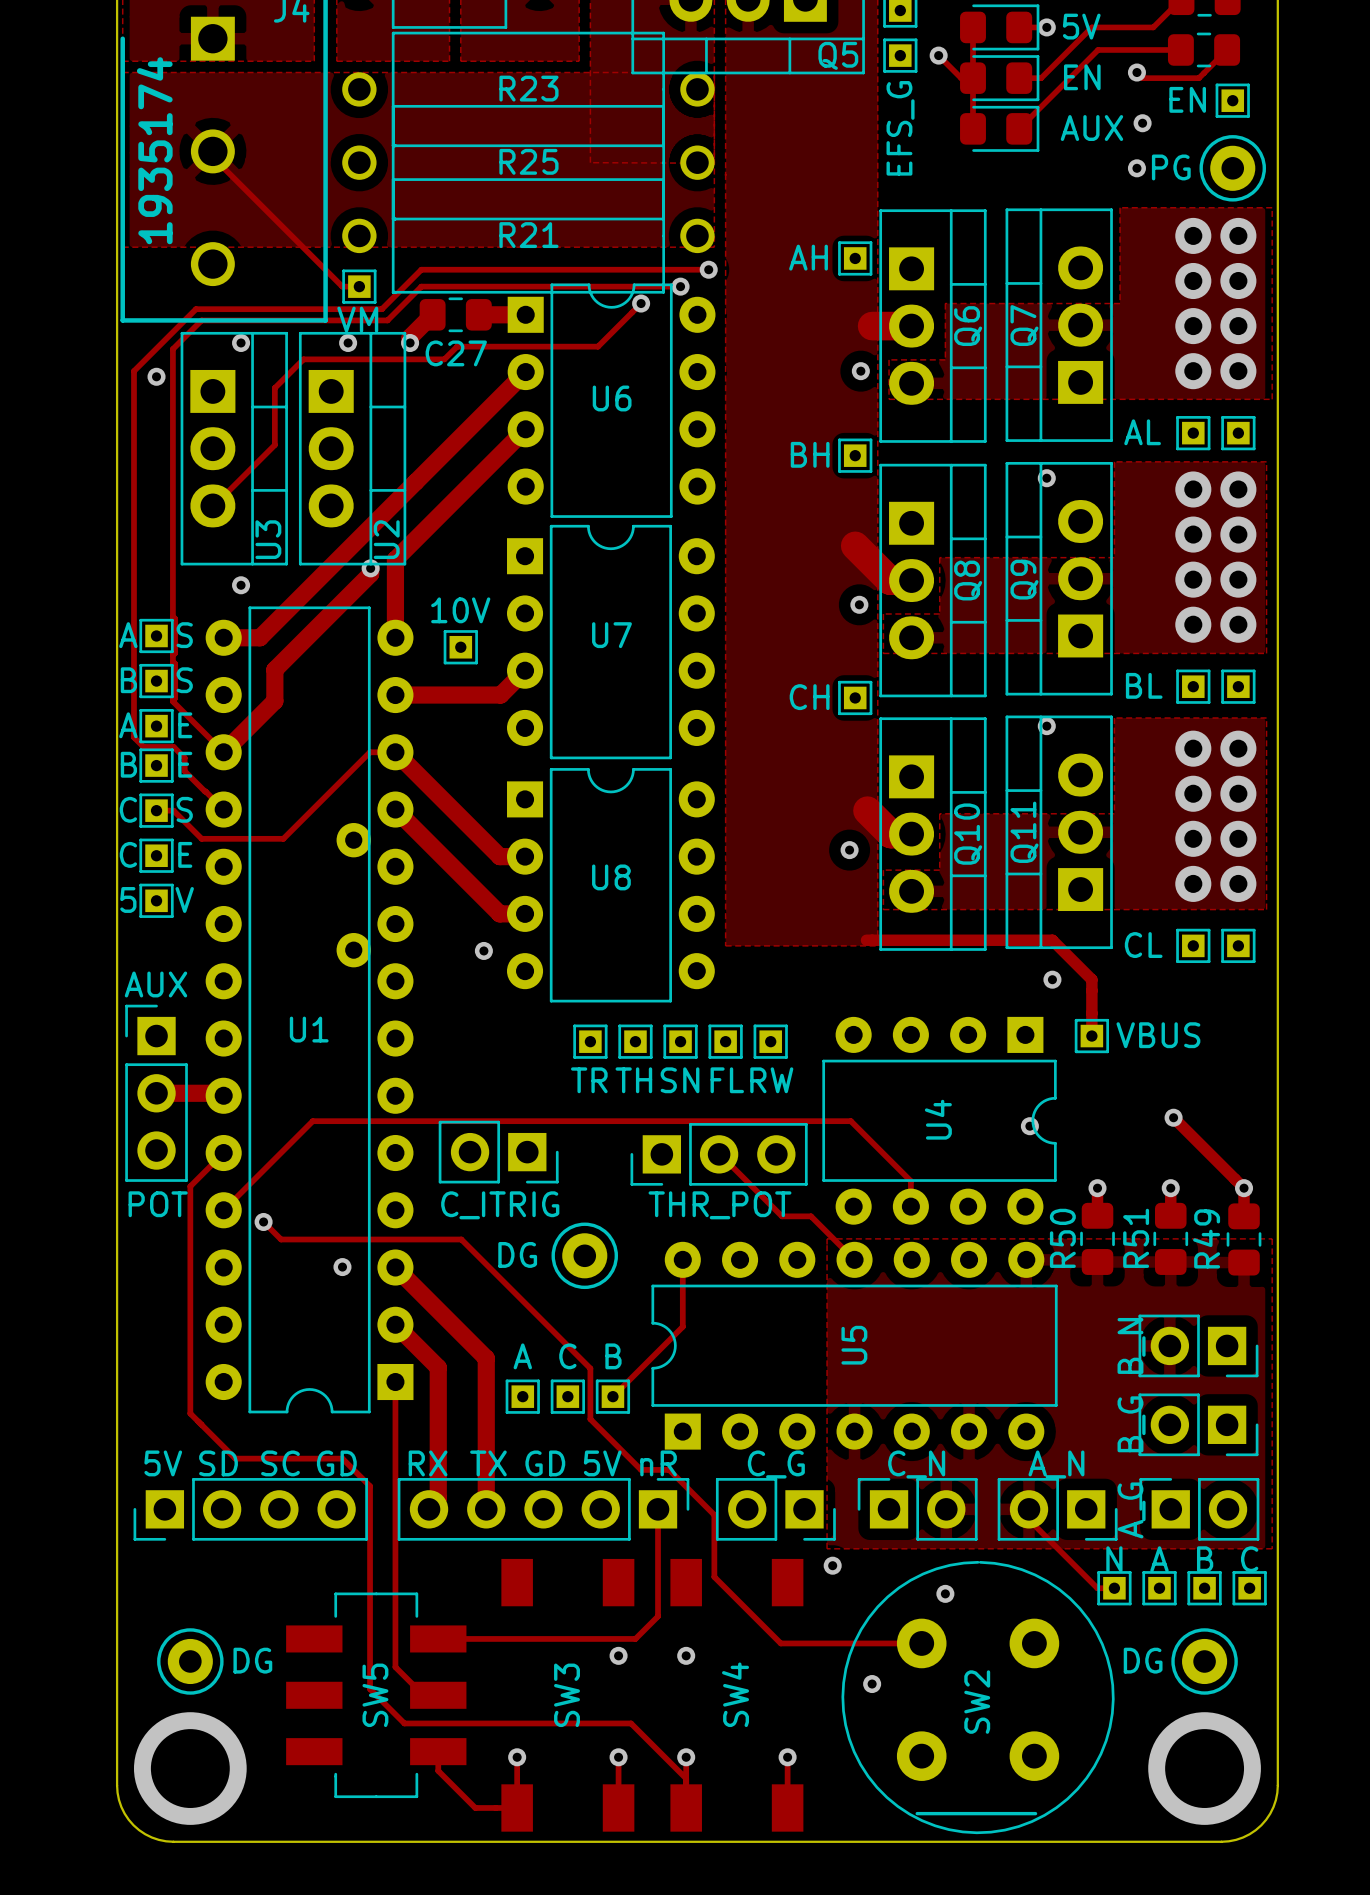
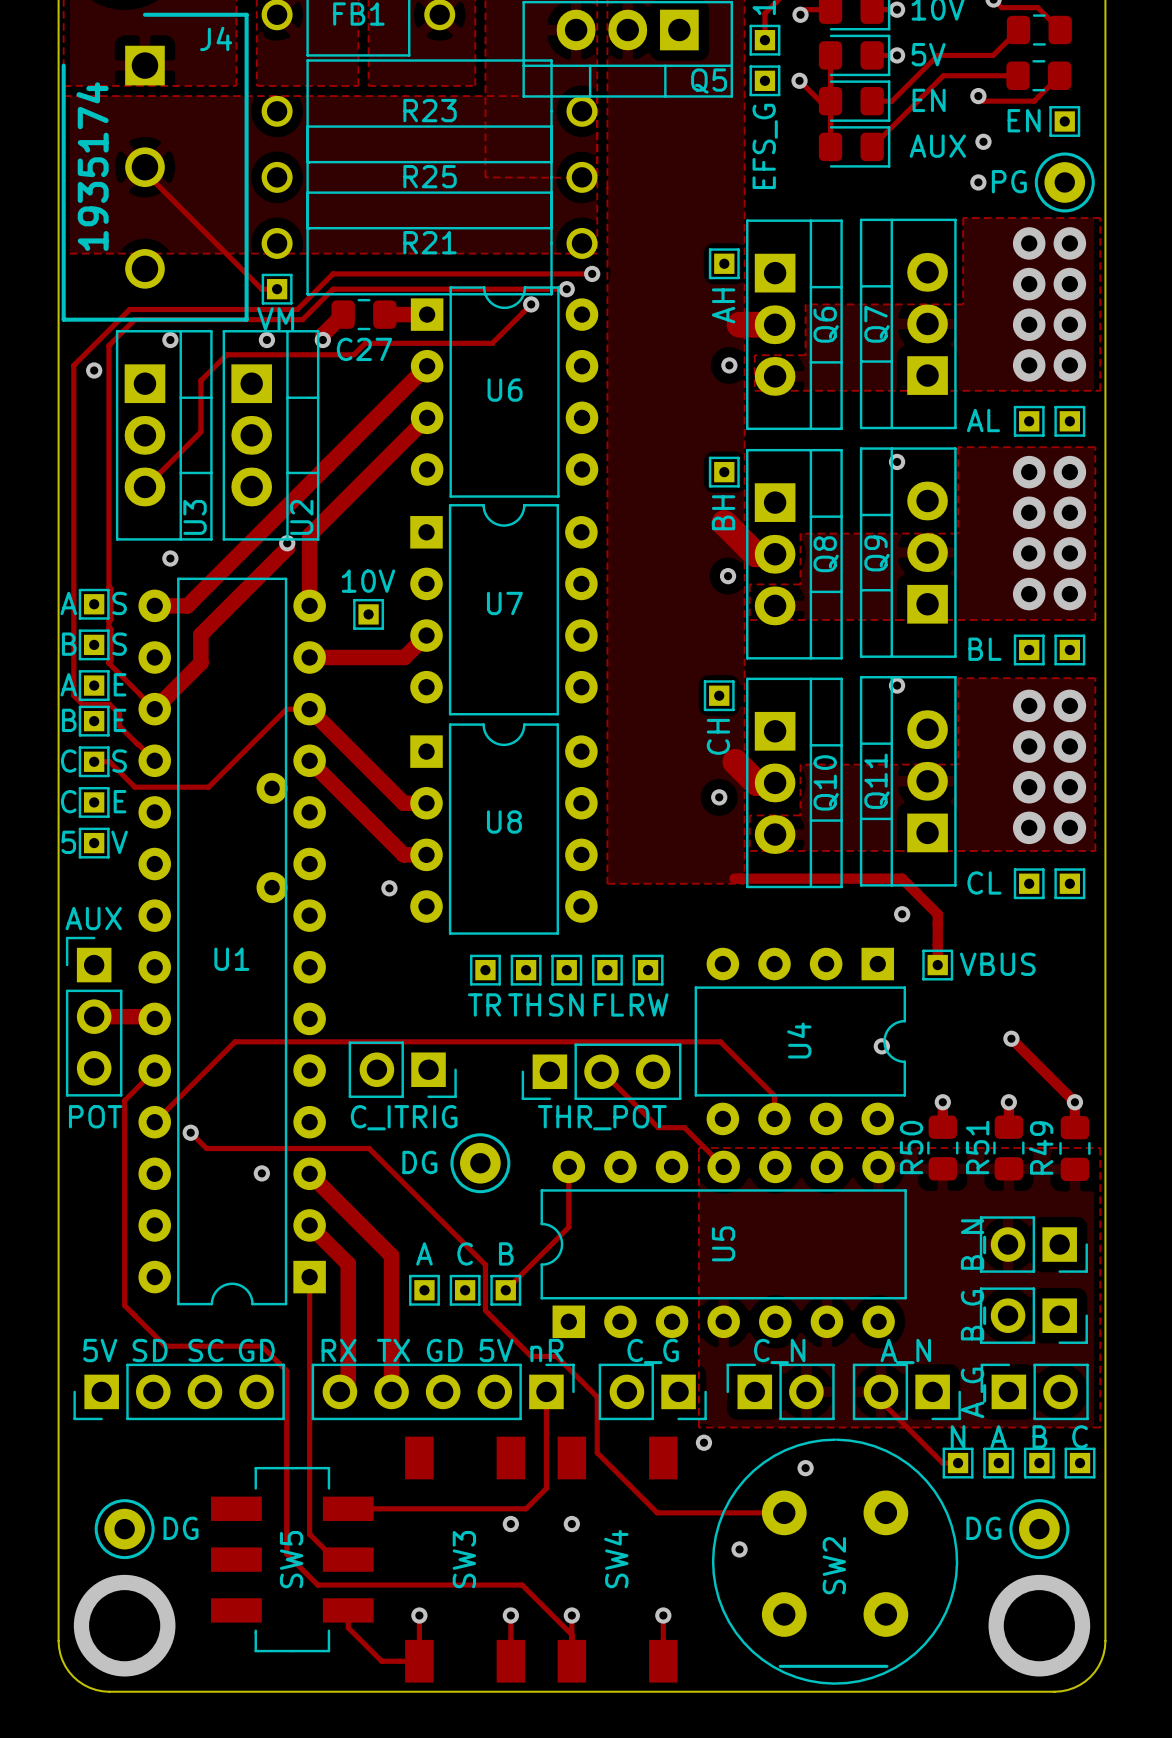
text rotation: 0° (808, 257) -> 90° counterclockwise (723, 305)
text position: AH (808, 257) -> AH (723, 305)
text rotation: 0° (810, 454) -> 90° counterclockwise (723, 512)
text position: BH (810, 454) -> BH (723, 512)
part position: (855, 455) -> (724, 472)
text rotation: 0° (809, 697) -> 90° counterclockwise (718, 736)
text position: CH (809, 697) -> CH (718, 736)
part position: (855, 697) -> (719, 695)

